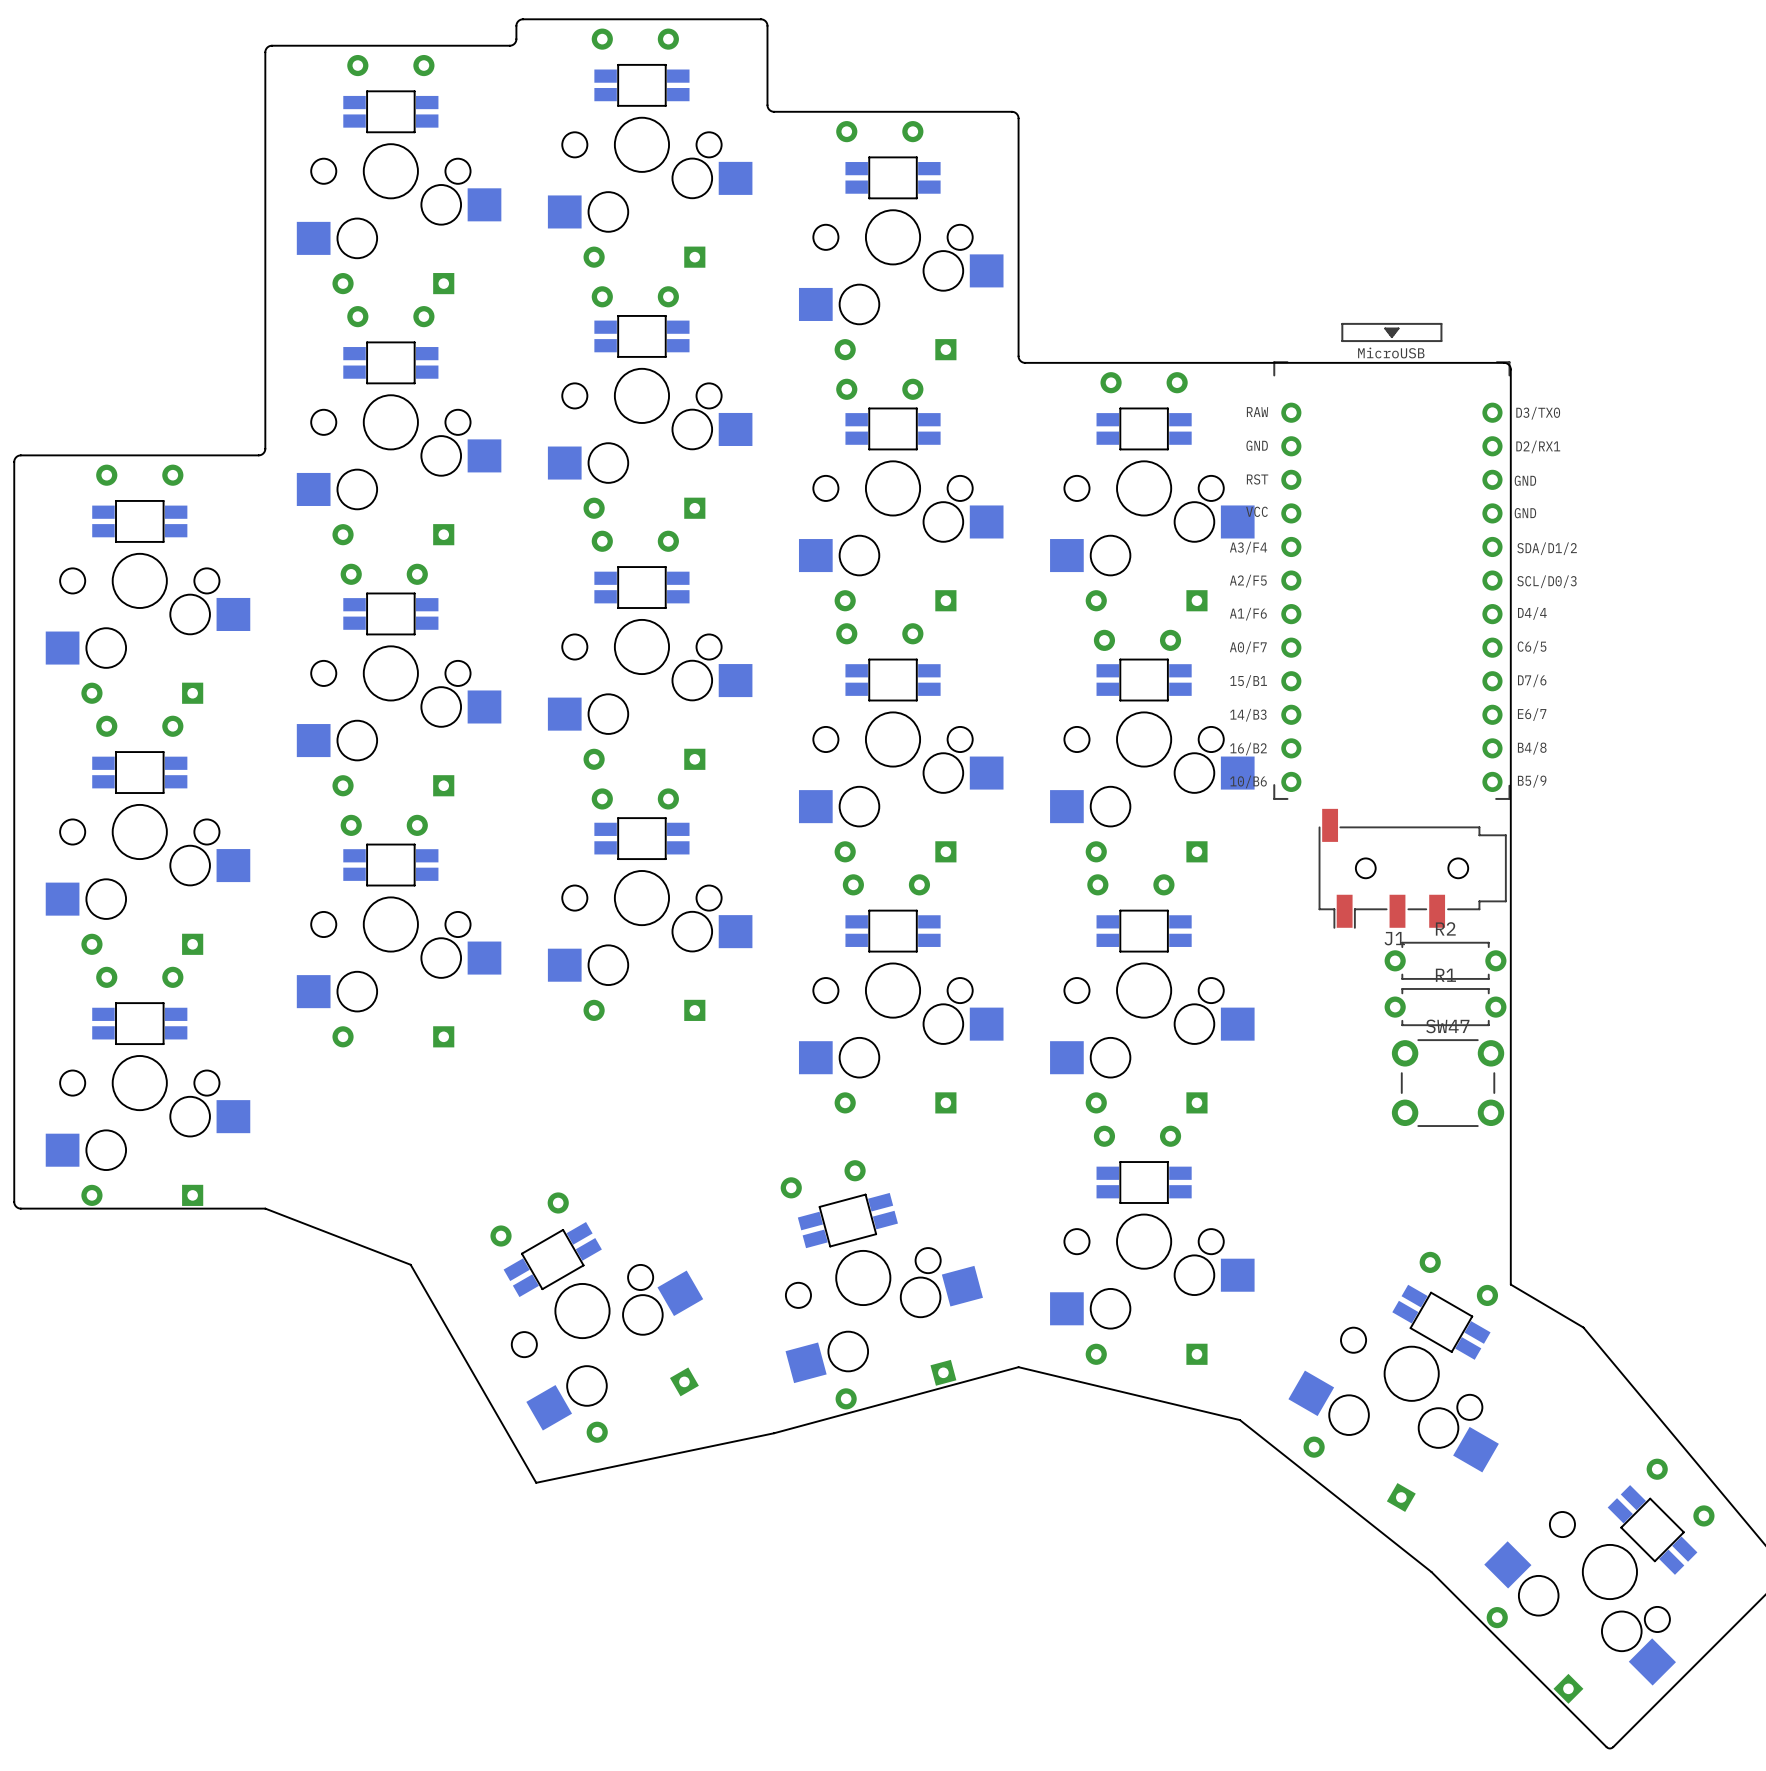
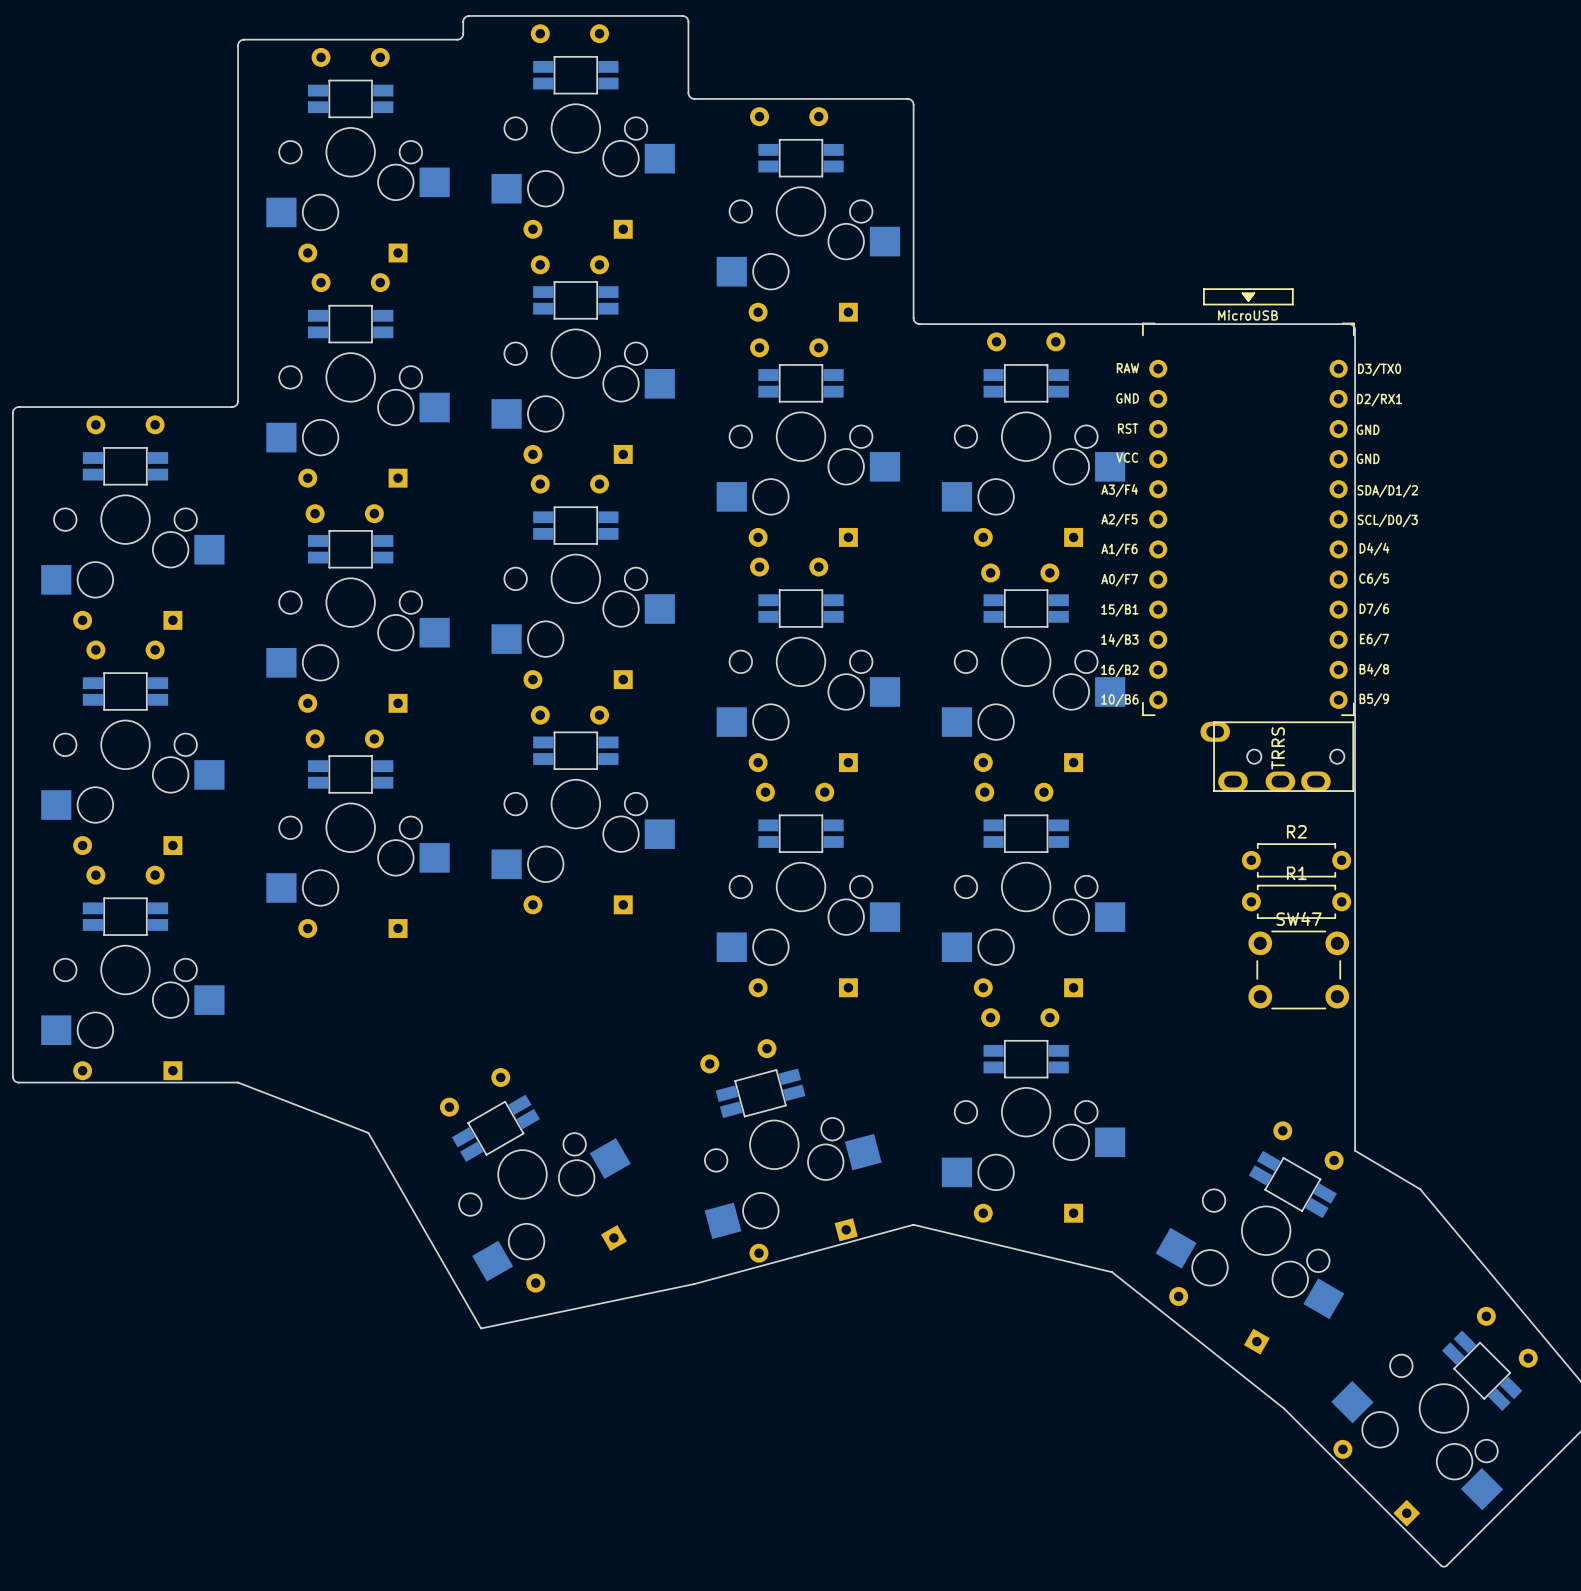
part: none -> (1277, 756)
J1: (1412, 868) -> none

